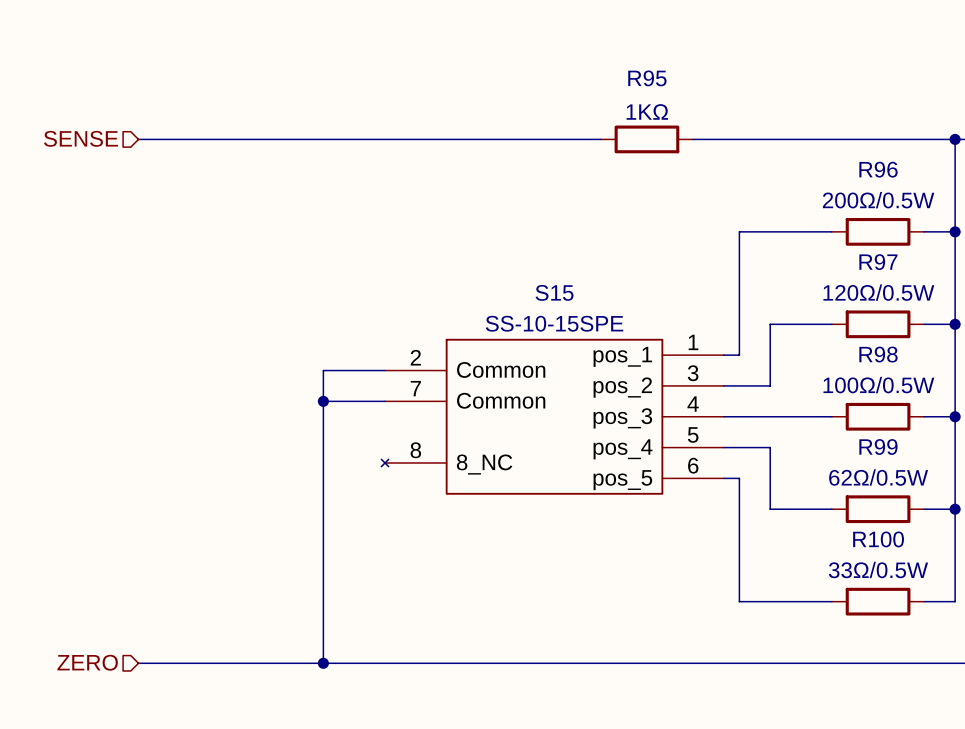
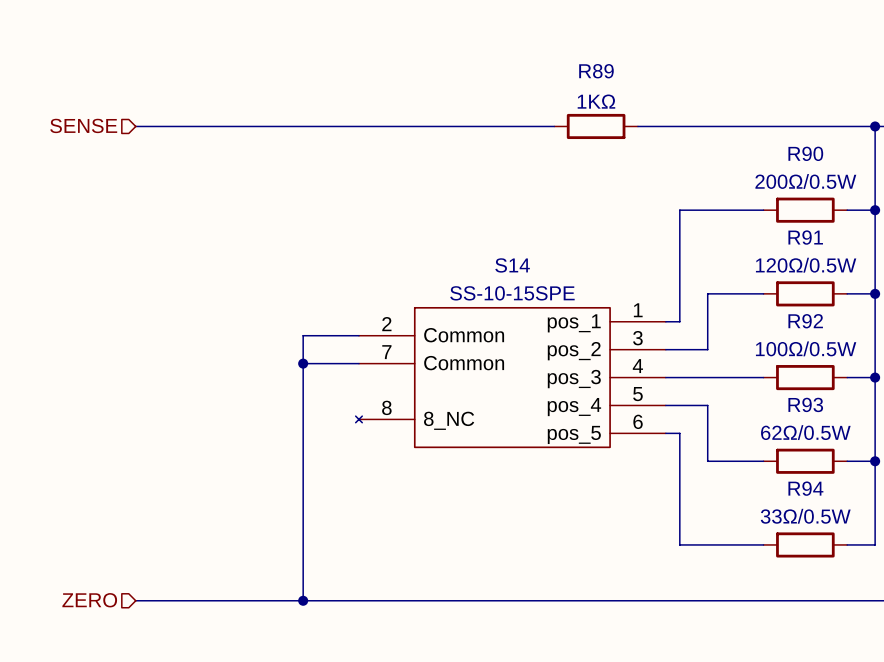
R95 name: R95 (647, 78) -> R89 (596, 71)
R96 name: R96 (878, 169) -> R90 (805, 153)
R97 name: R97 (878, 262) -> R91 (805, 237)
S15 name: S15 (554, 292) -> S14 (512, 265)
R98 name: R98 (878, 354) -> R92 (805, 321)
R99 name: R99 (878, 447) -> R93 (805, 404)
R100 name: R100 (878, 539) -> R94 (805, 488)

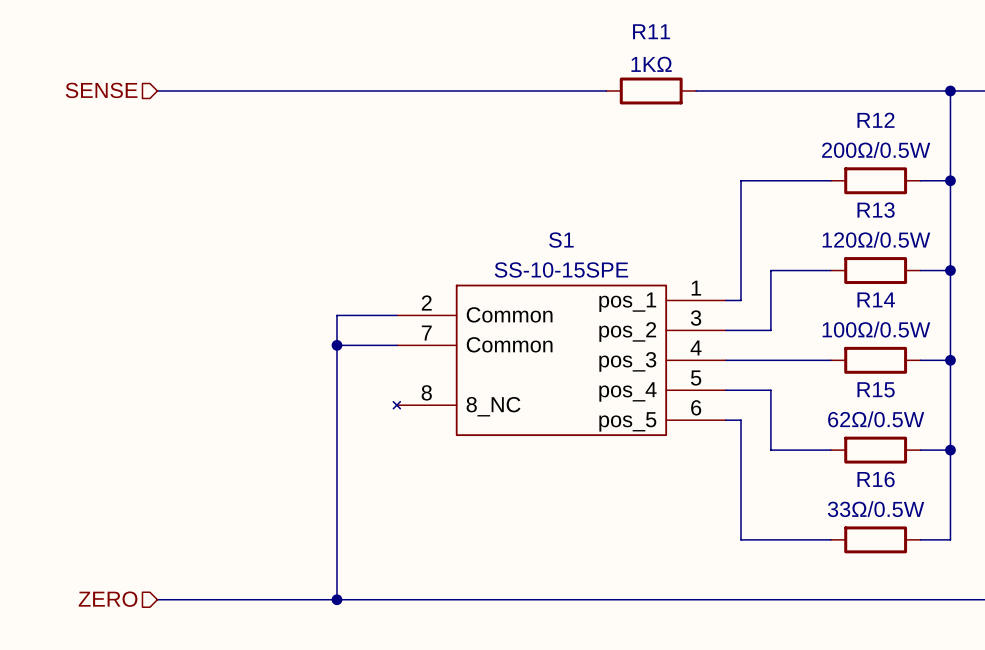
R89 name: R89 (596, 71) -> R11 (651, 31)
R90 name: R90 (805, 153) -> R12 (876, 120)
R91 name: R91 (805, 237) -> R13 (876, 210)
S14 name: S14 (512, 265) -> S1 (561, 240)
R92 name: R92 (805, 321) -> R14 (876, 299)
R93 name: R93 (805, 404) -> R15 (876, 389)
R94 name: R94 (805, 488) -> R16 (876, 479)

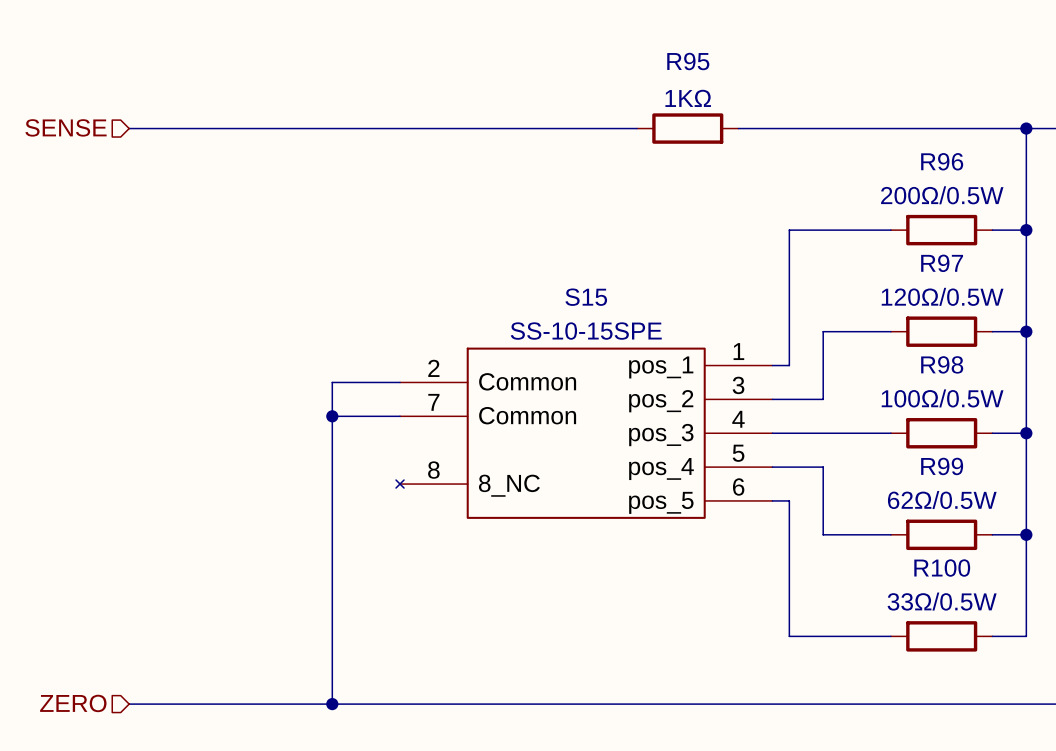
R11 name: R11 (651, 31) -> R95 (688, 61)
R12 name: R12 (876, 120) -> R96 (942, 161)
R13 name: R13 (876, 210) -> R97 (942, 263)
S1 name: S1 (561, 240) -> S15 (586, 297)
R14 name: R14 (876, 299) -> R98 (942, 364)
R15 name: R15 (876, 389) -> R99 (942, 466)
R16 name: R16 (876, 479) -> R100 (942, 568)

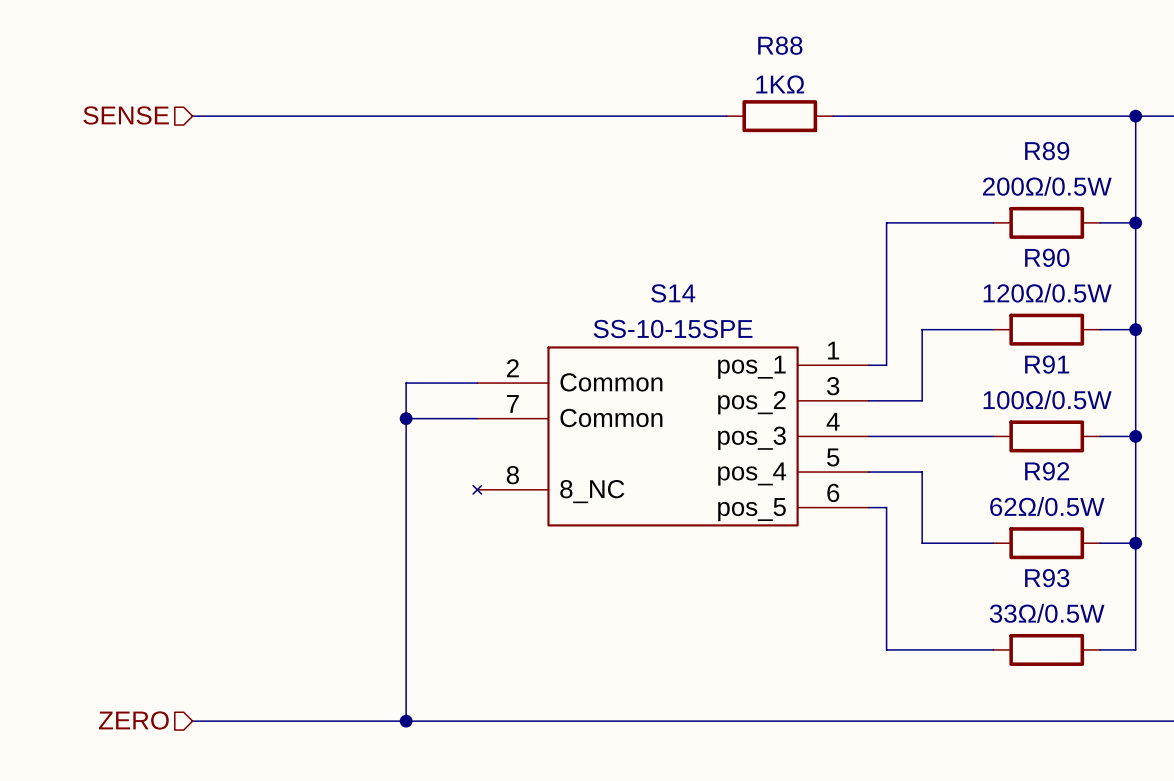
R95 name: R95 (688, 61) -> R88 (780, 45)
R96 name: R96 (942, 161) -> R89 (1047, 151)
R97 name: R97 (942, 263) -> R90 (1047, 257)
S15 name: S15 (586, 297) -> S14 (673, 293)
R98 name: R98 (942, 364) -> R91 (1047, 364)
R99 name: R99 (942, 466) -> R92 (1047, 471)
R100 name: R100 (942, 568) -> R93 (1047, 578)

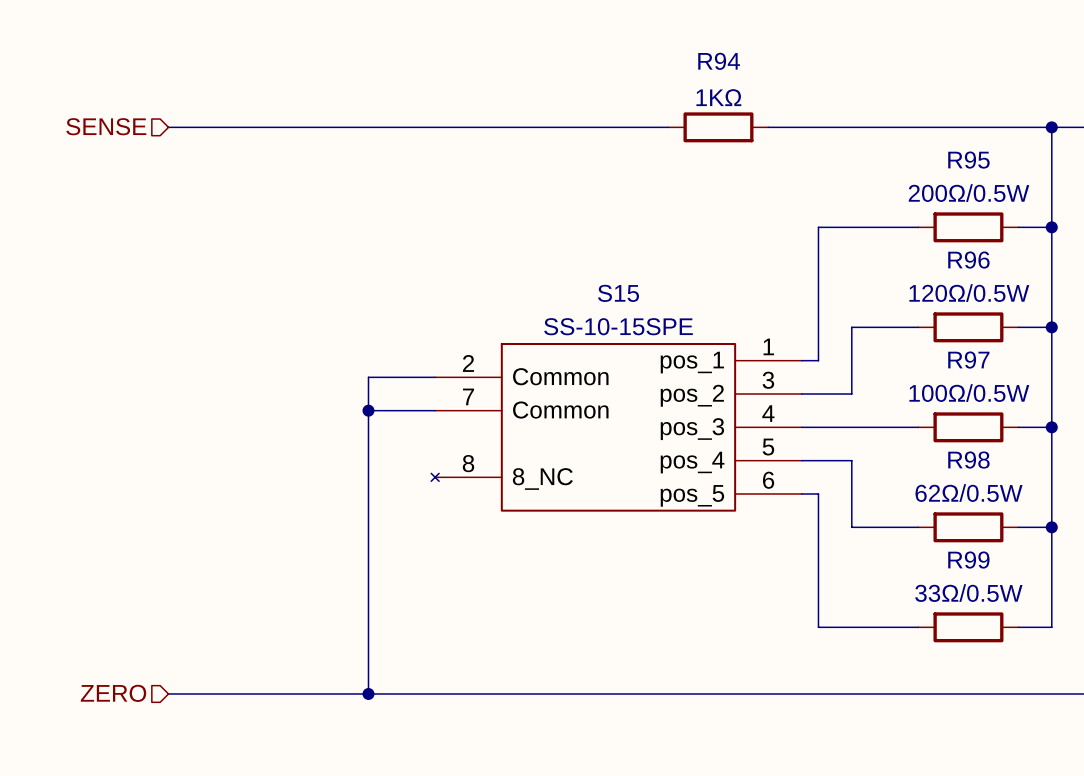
R88 name: R88 (780, 45) -> R94 (719, 61)
R89 name: R89 (1047, 151) -> R95 (968, 160)
R90 name: R90 (1047, 257) -> R96 (968, 260)
S14 name: S14 (673, 293) -> S15 (618, 293)
R91 name: R91 (1047, 364) -> R97 (968, 360)
R92 name: R92 (1047, 471) -> R98 (968, 460)
R93 name: R93 (1047, 578) -> R99 (968, 560)

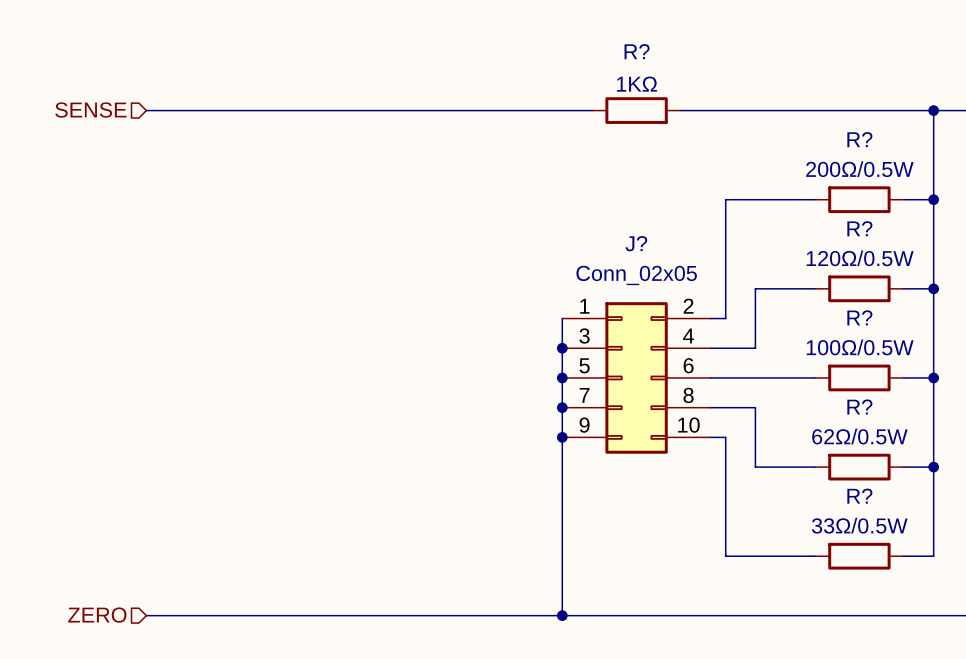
R94 name: R94 (719, 61) -> R? (637, 51)
R95 name: R95 (968, 160) -> R? (859, 139)
R96 name: R96 (968, 260) -> R? (859, 228)
wire: none -> (562, 318) (562, 615)
R97 name: R97 (968, 360) -> R? (859, 317)
wire: (435, 377) (368, 377) (368, 693) -> none
junction: none -> (562, 348)
wire: (368, 410) (435, 410) -> none
junction: (368, 410) -> none
S15: SS-10-15SPE (616, 427) -> none
junction: none -> (562, 377)
J?: none -> Conn_02x05 (636, 377)
junction: none -> (562, 407)
R98 name: R98 (968, 460) -> R? (859, 407)
junction: none -> (562, 437)
R99 name: R99 (968, 560) -> R? (859, 496)
junction: (368, 693) -> none
junction: none -> (562, 615)

